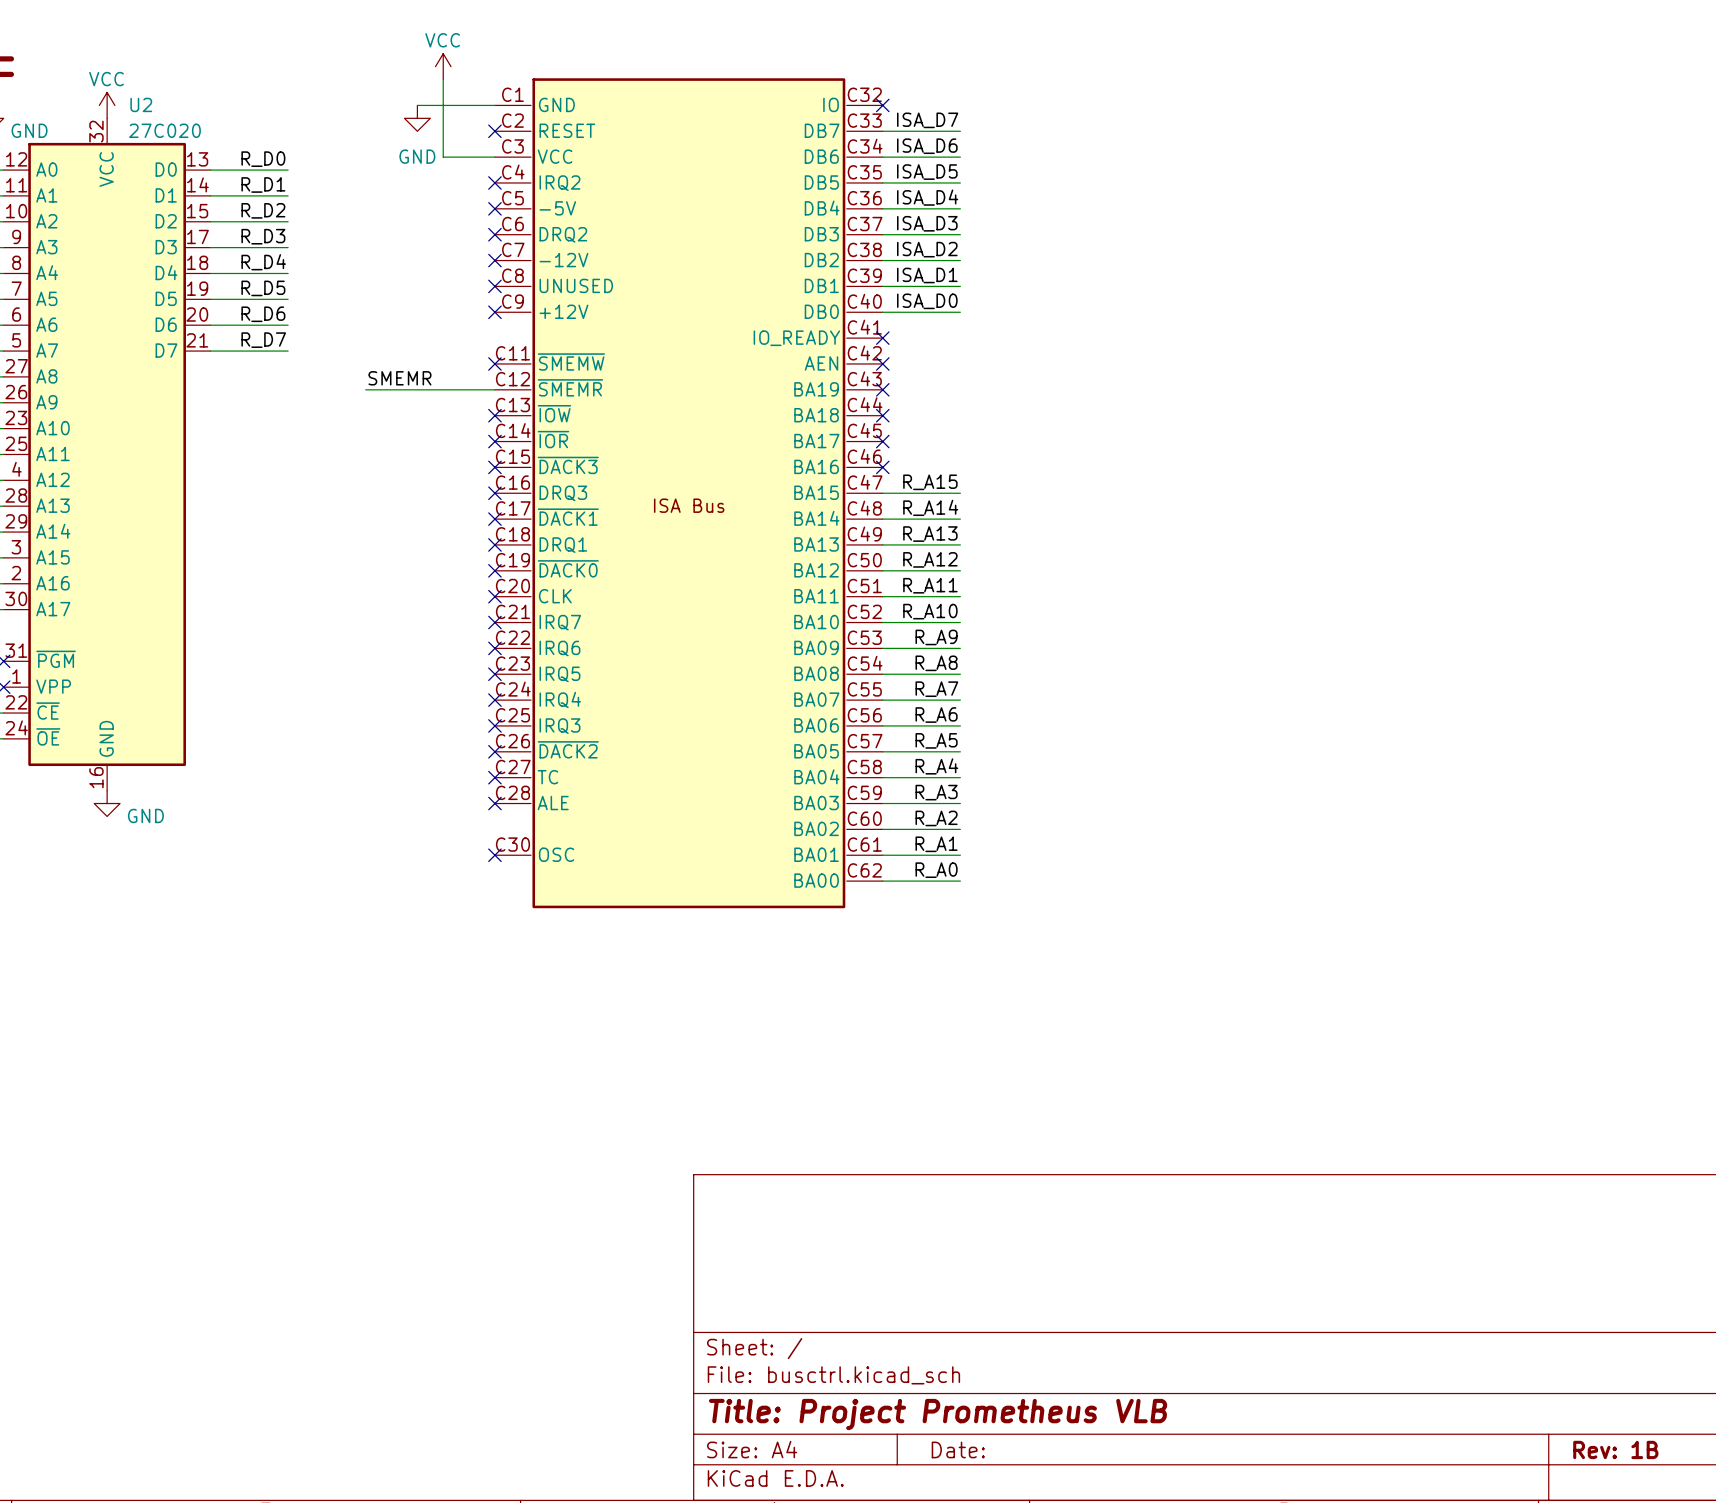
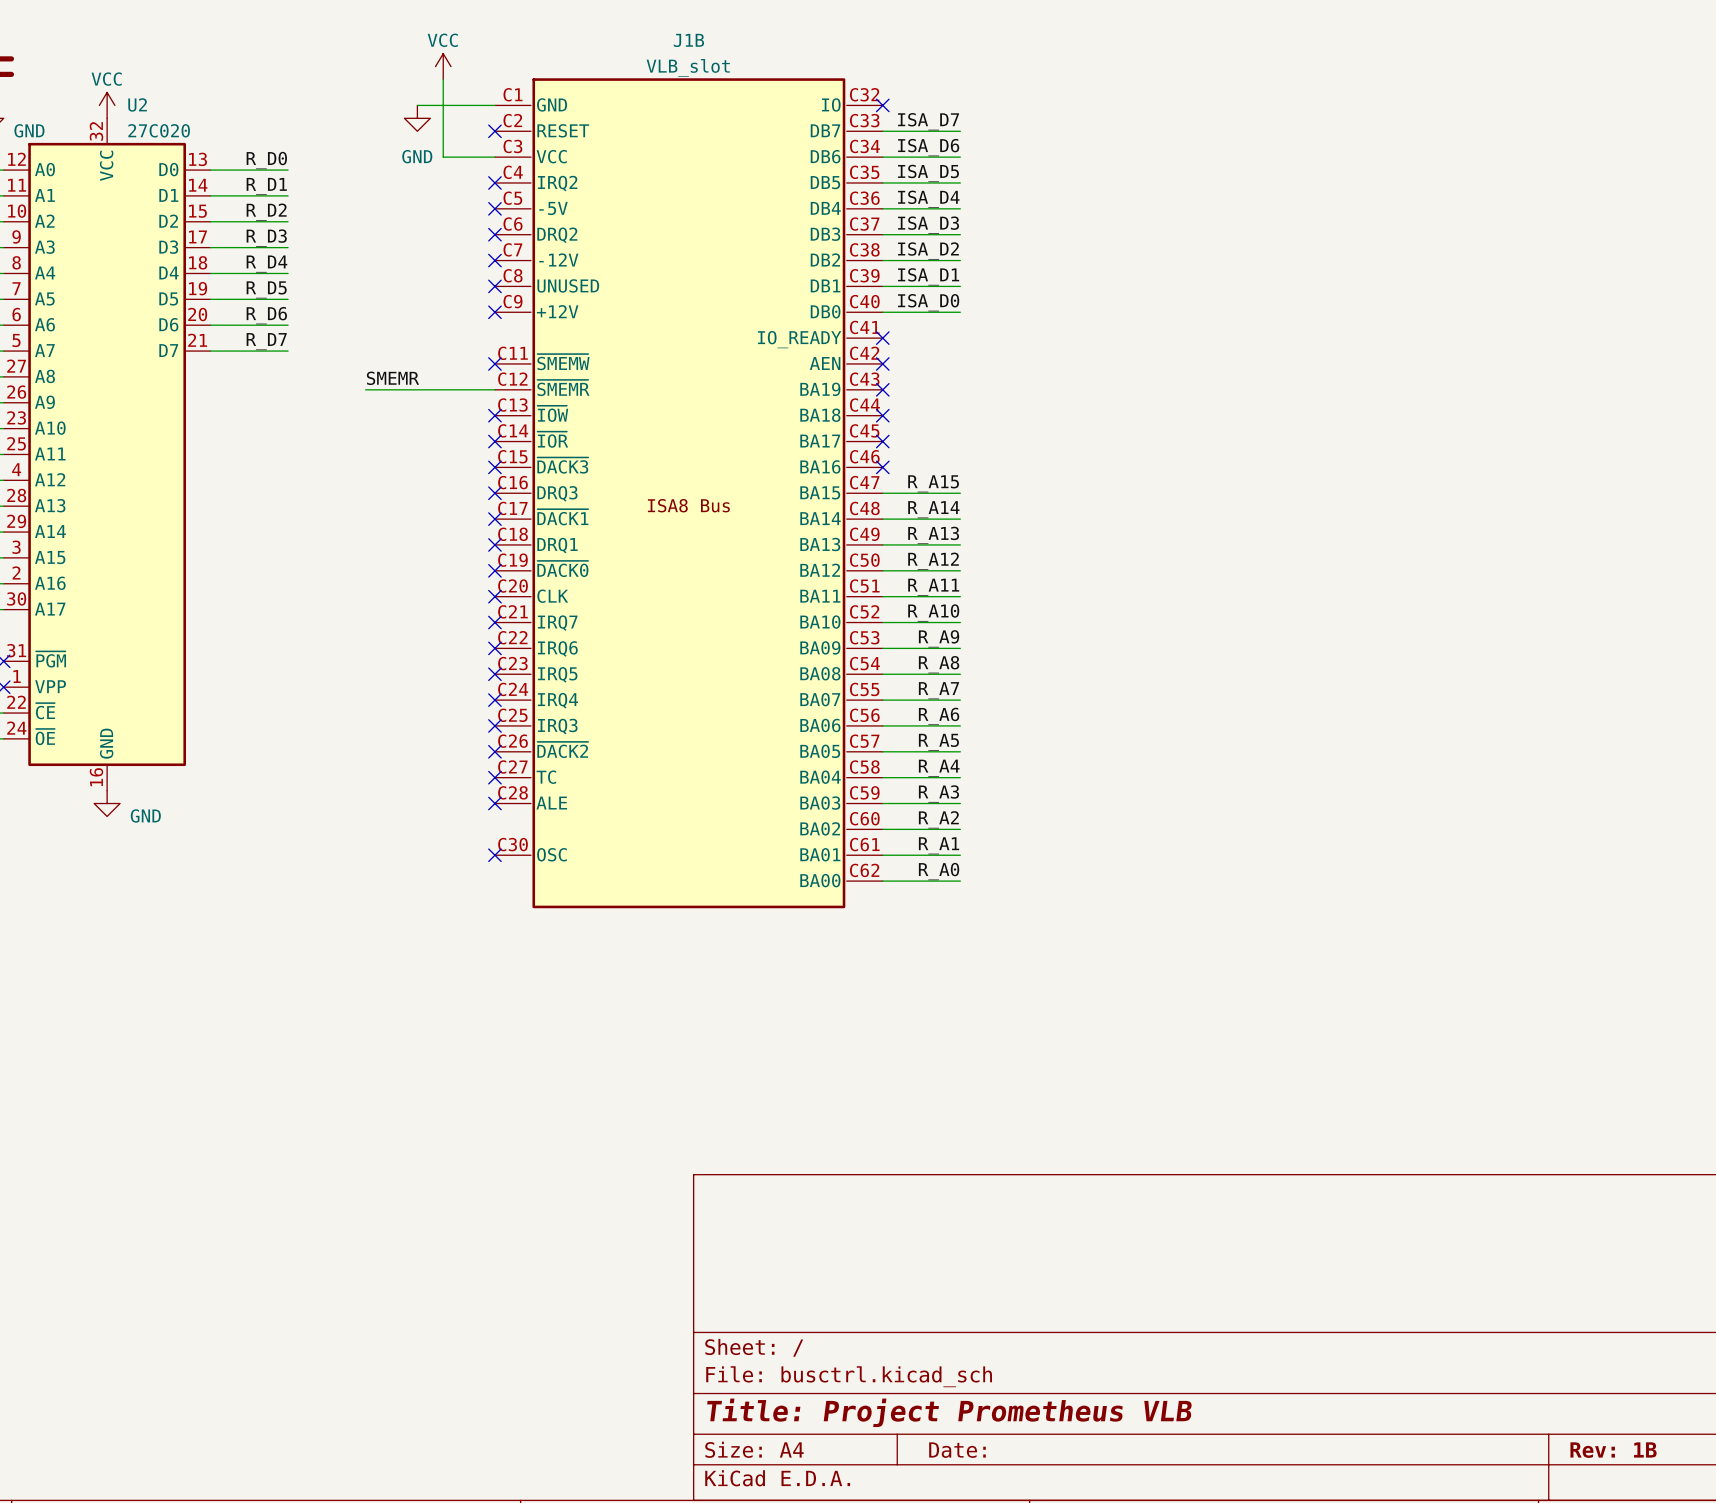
J1B name: none -> J1B (688, 40)
J1B value: none -> VLB_slot (688, 67)
J1B text: ISA Bus (689, 505) -> ISA8 Bus (688, 505)

